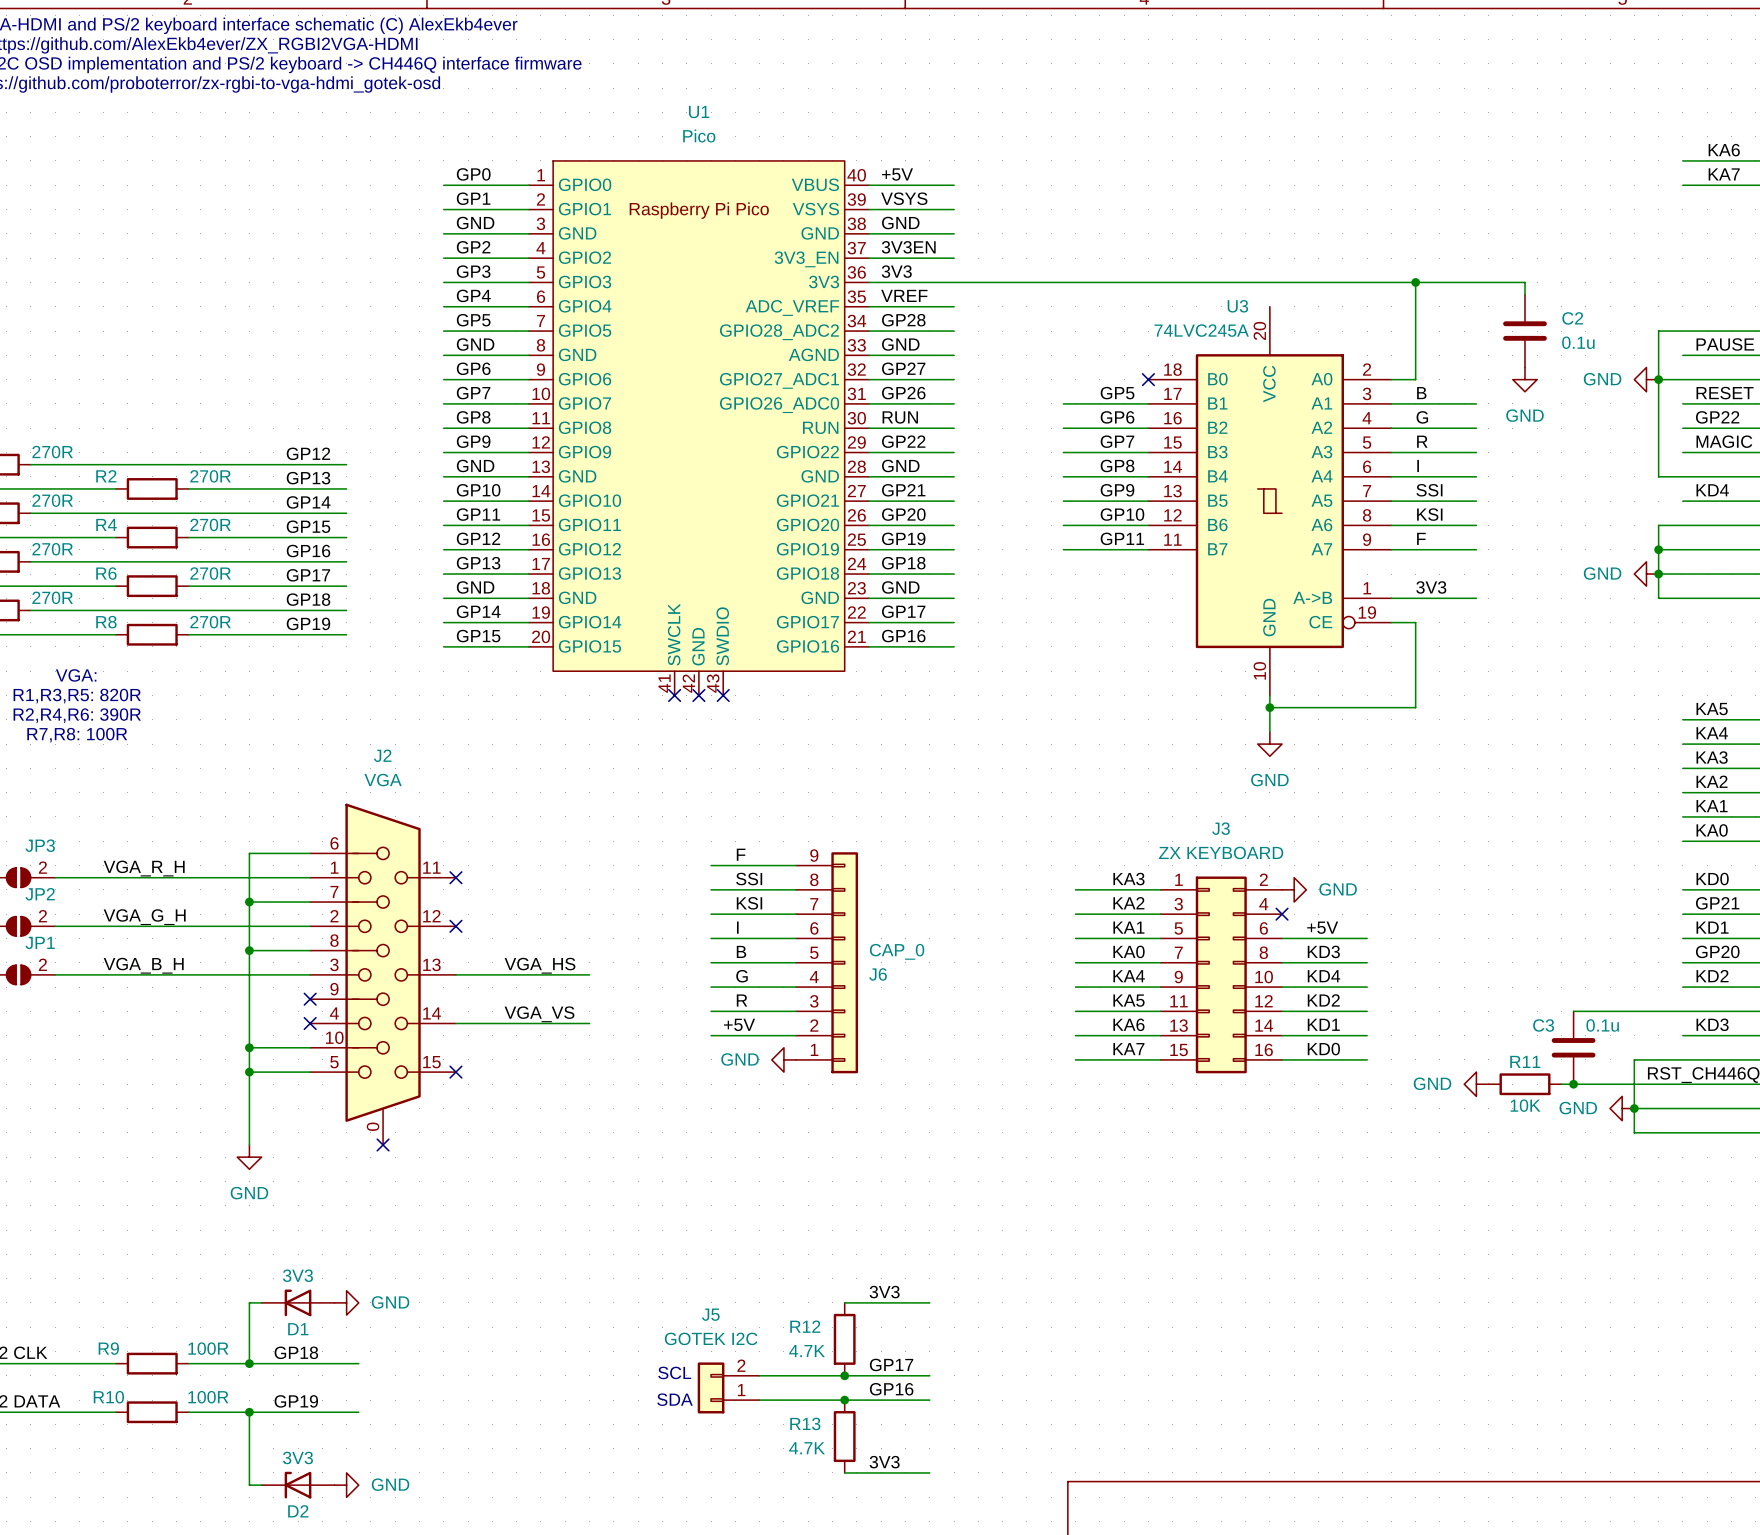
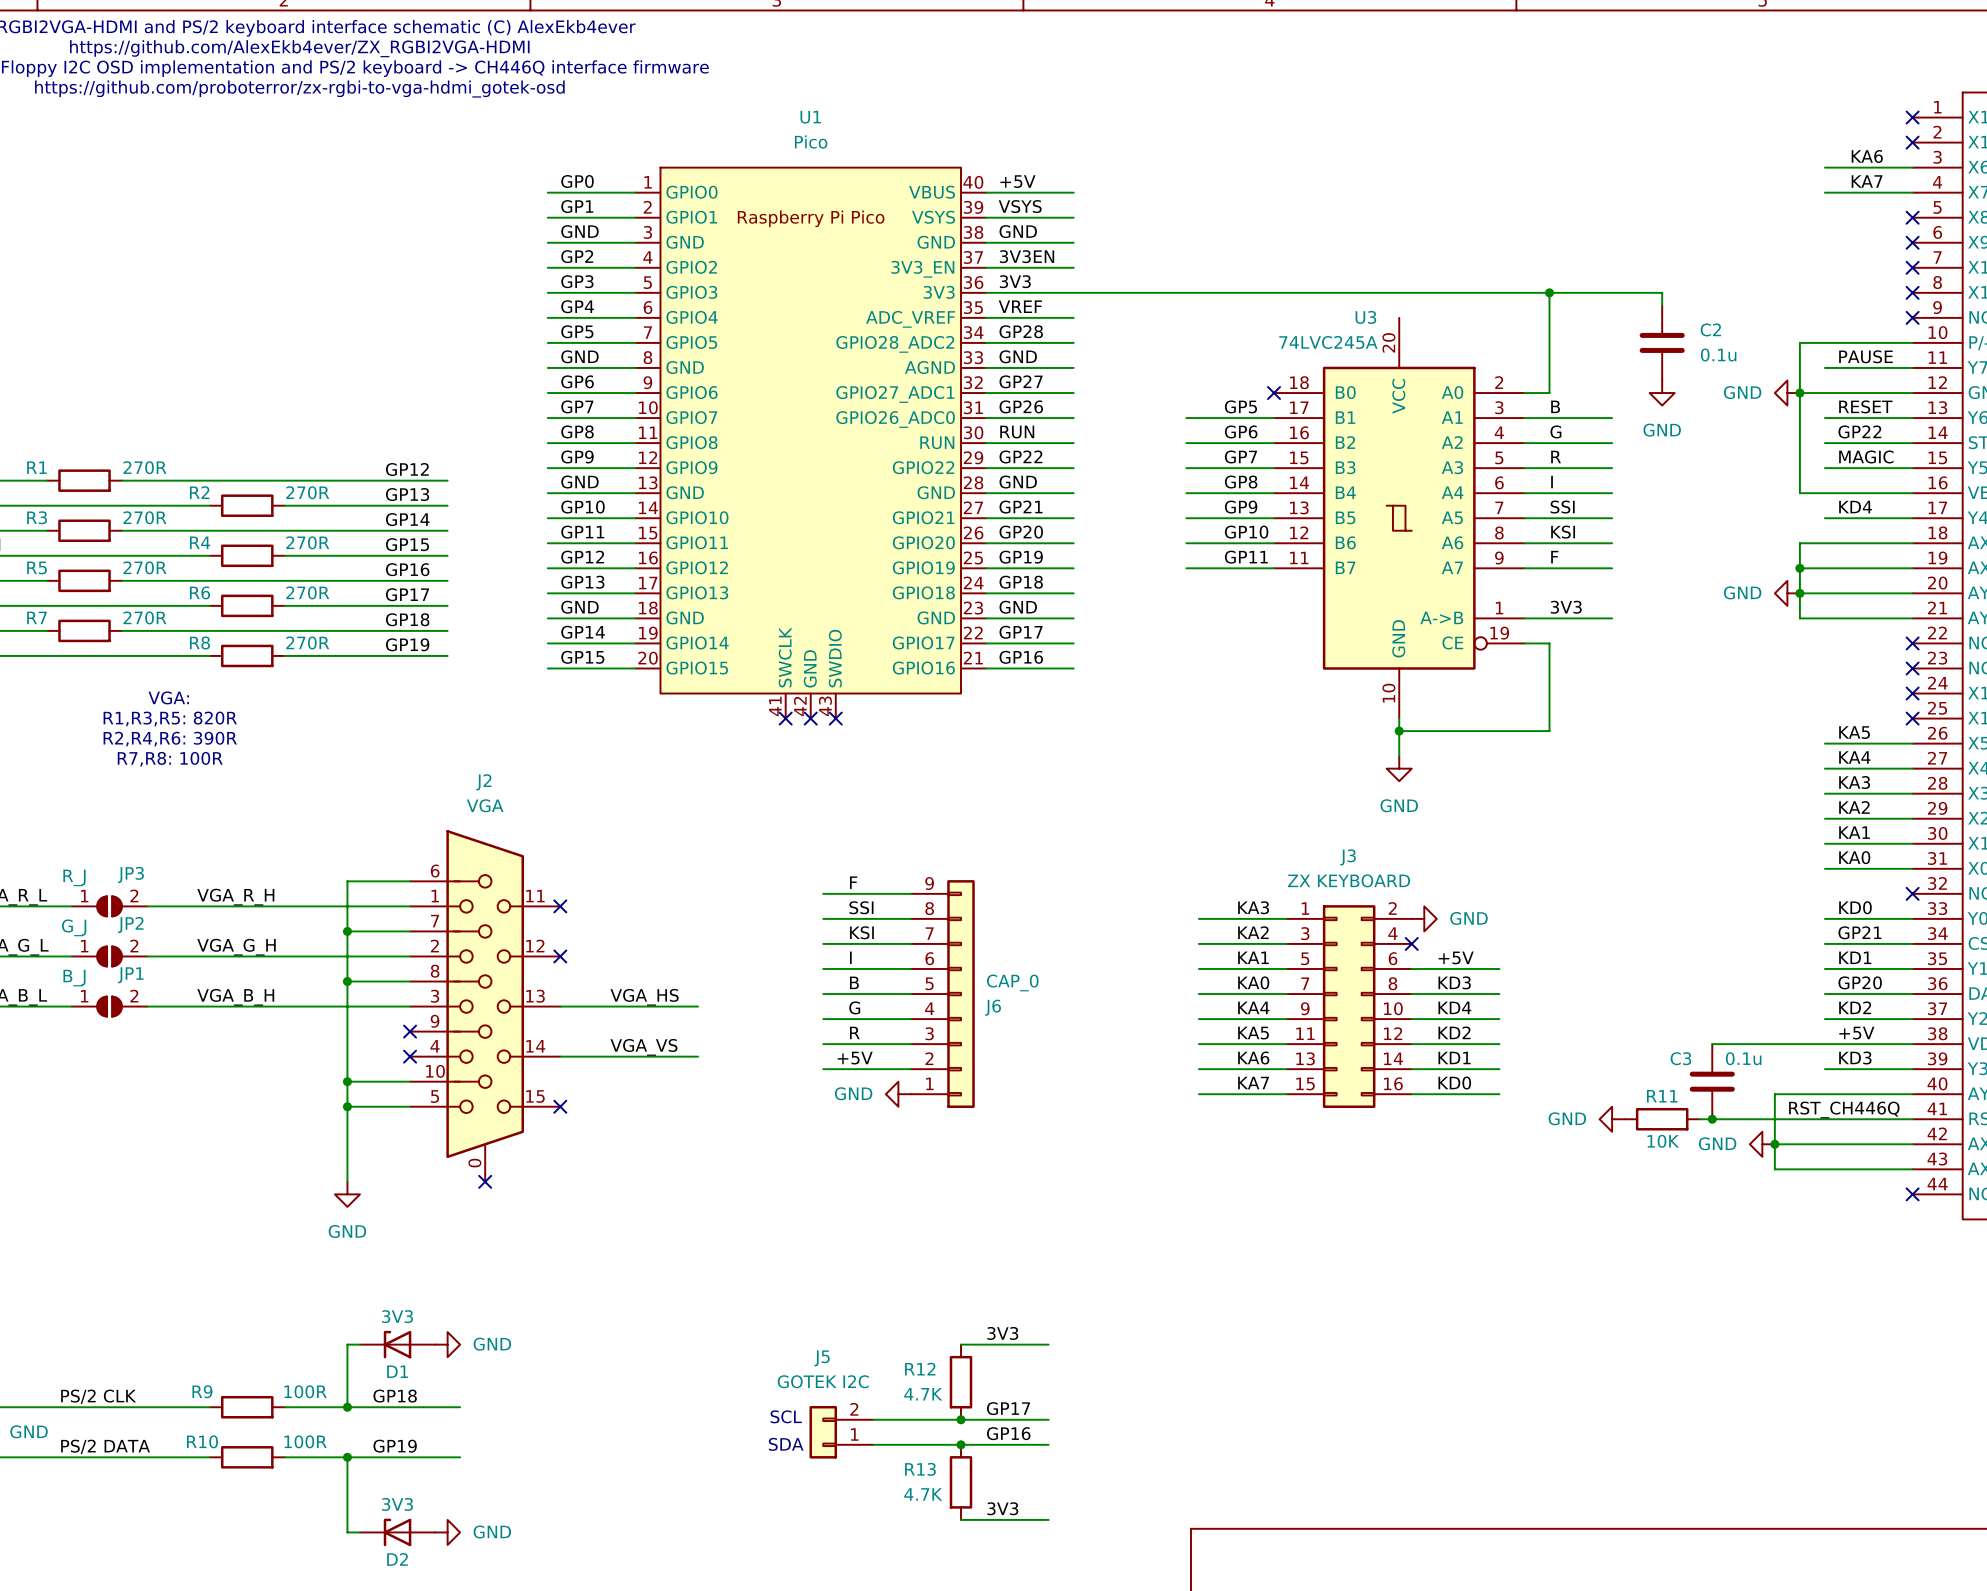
label: none -> +5V (1856, 1033)

